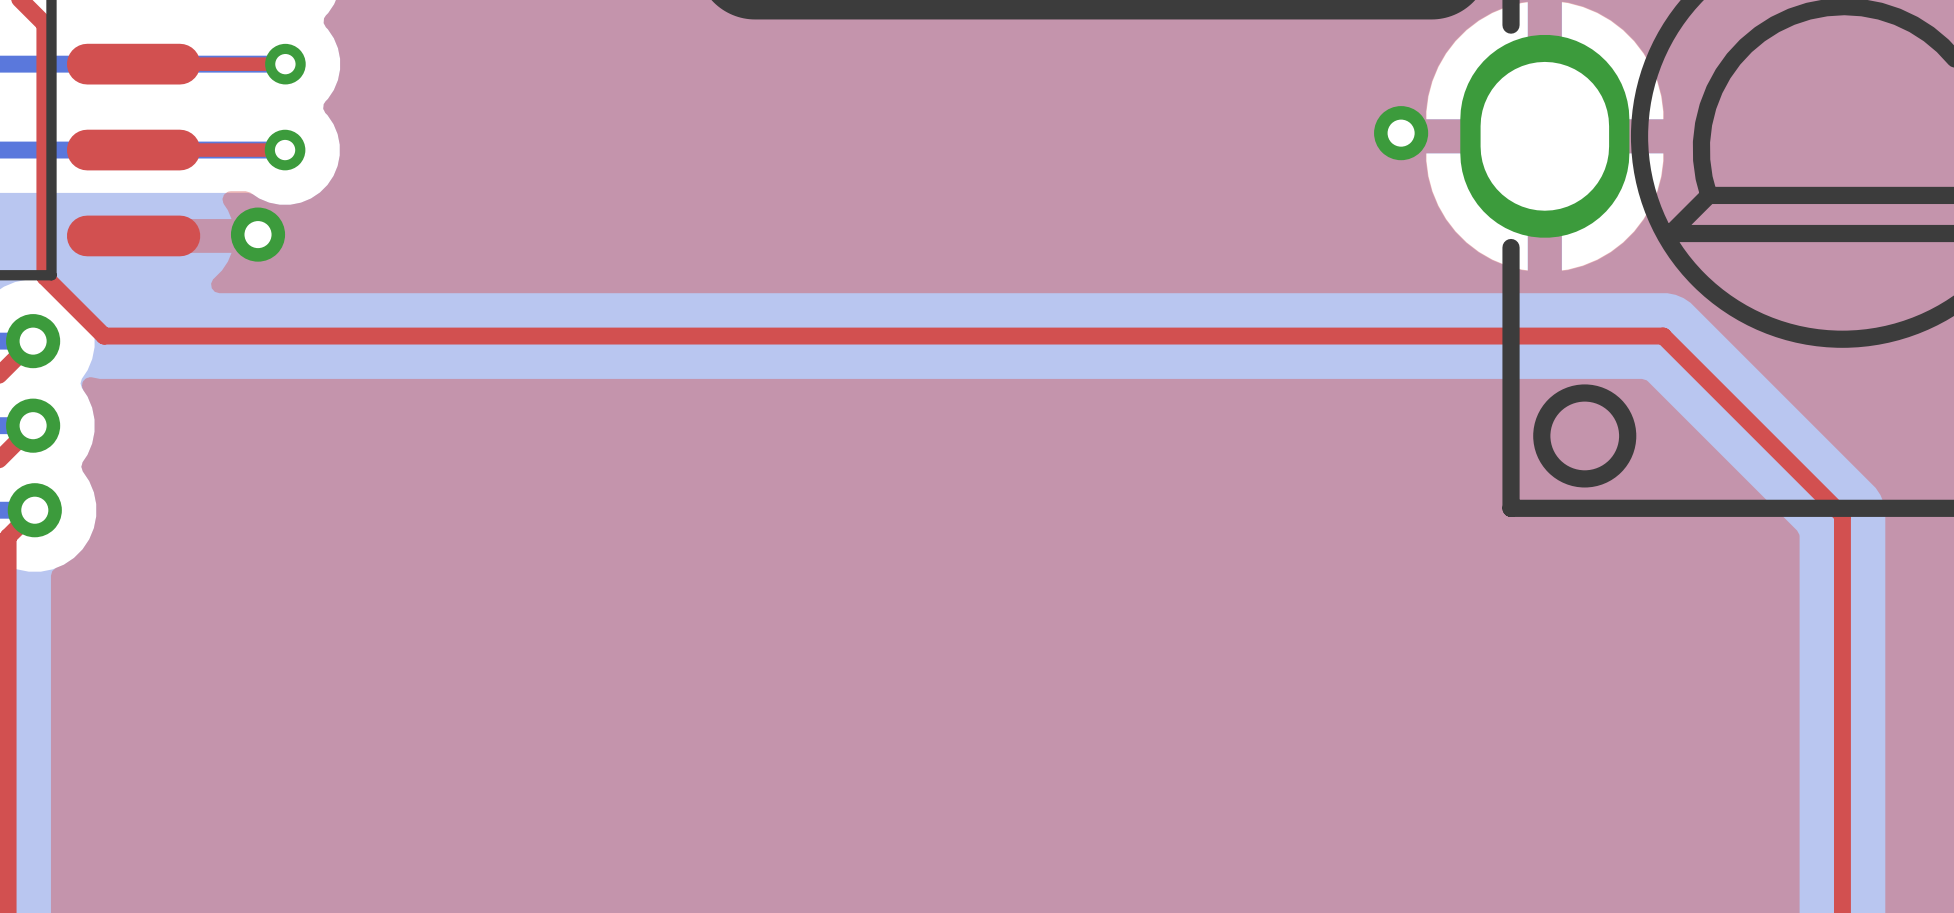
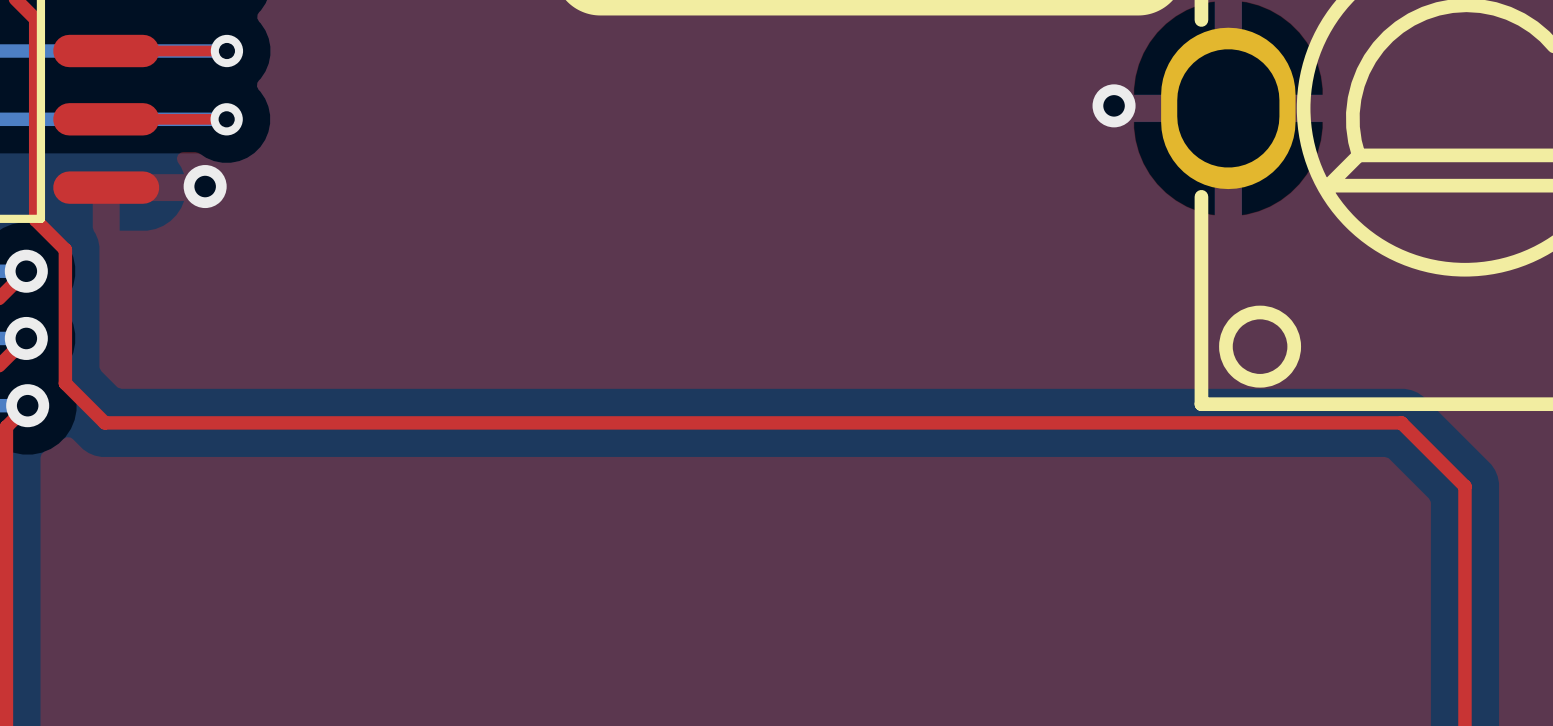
top track: (82, 314) (104, 336) (1663, 336) (1842, 515) (1842, 611) -> (65, 249) (65, 383) (104, 422) (1401, 422) (1464, 486)

